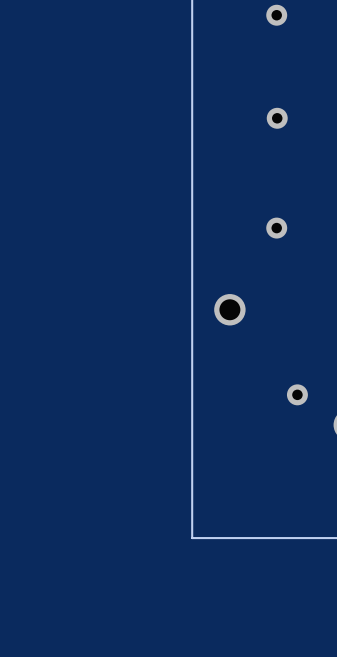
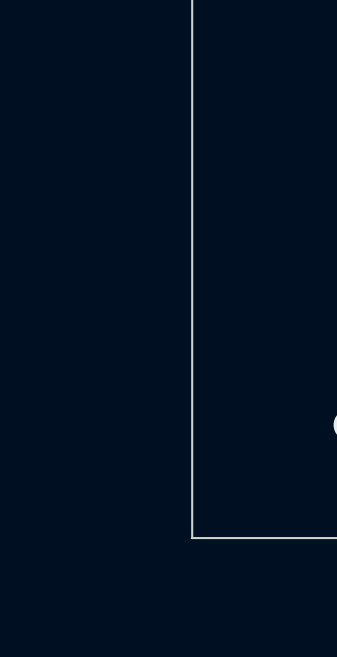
via: (276, 15) -> none
via: (277, 118) -> none
via: (276, 228) -> none
via: (229, 309) -> none
via: (297, 394) -> none

